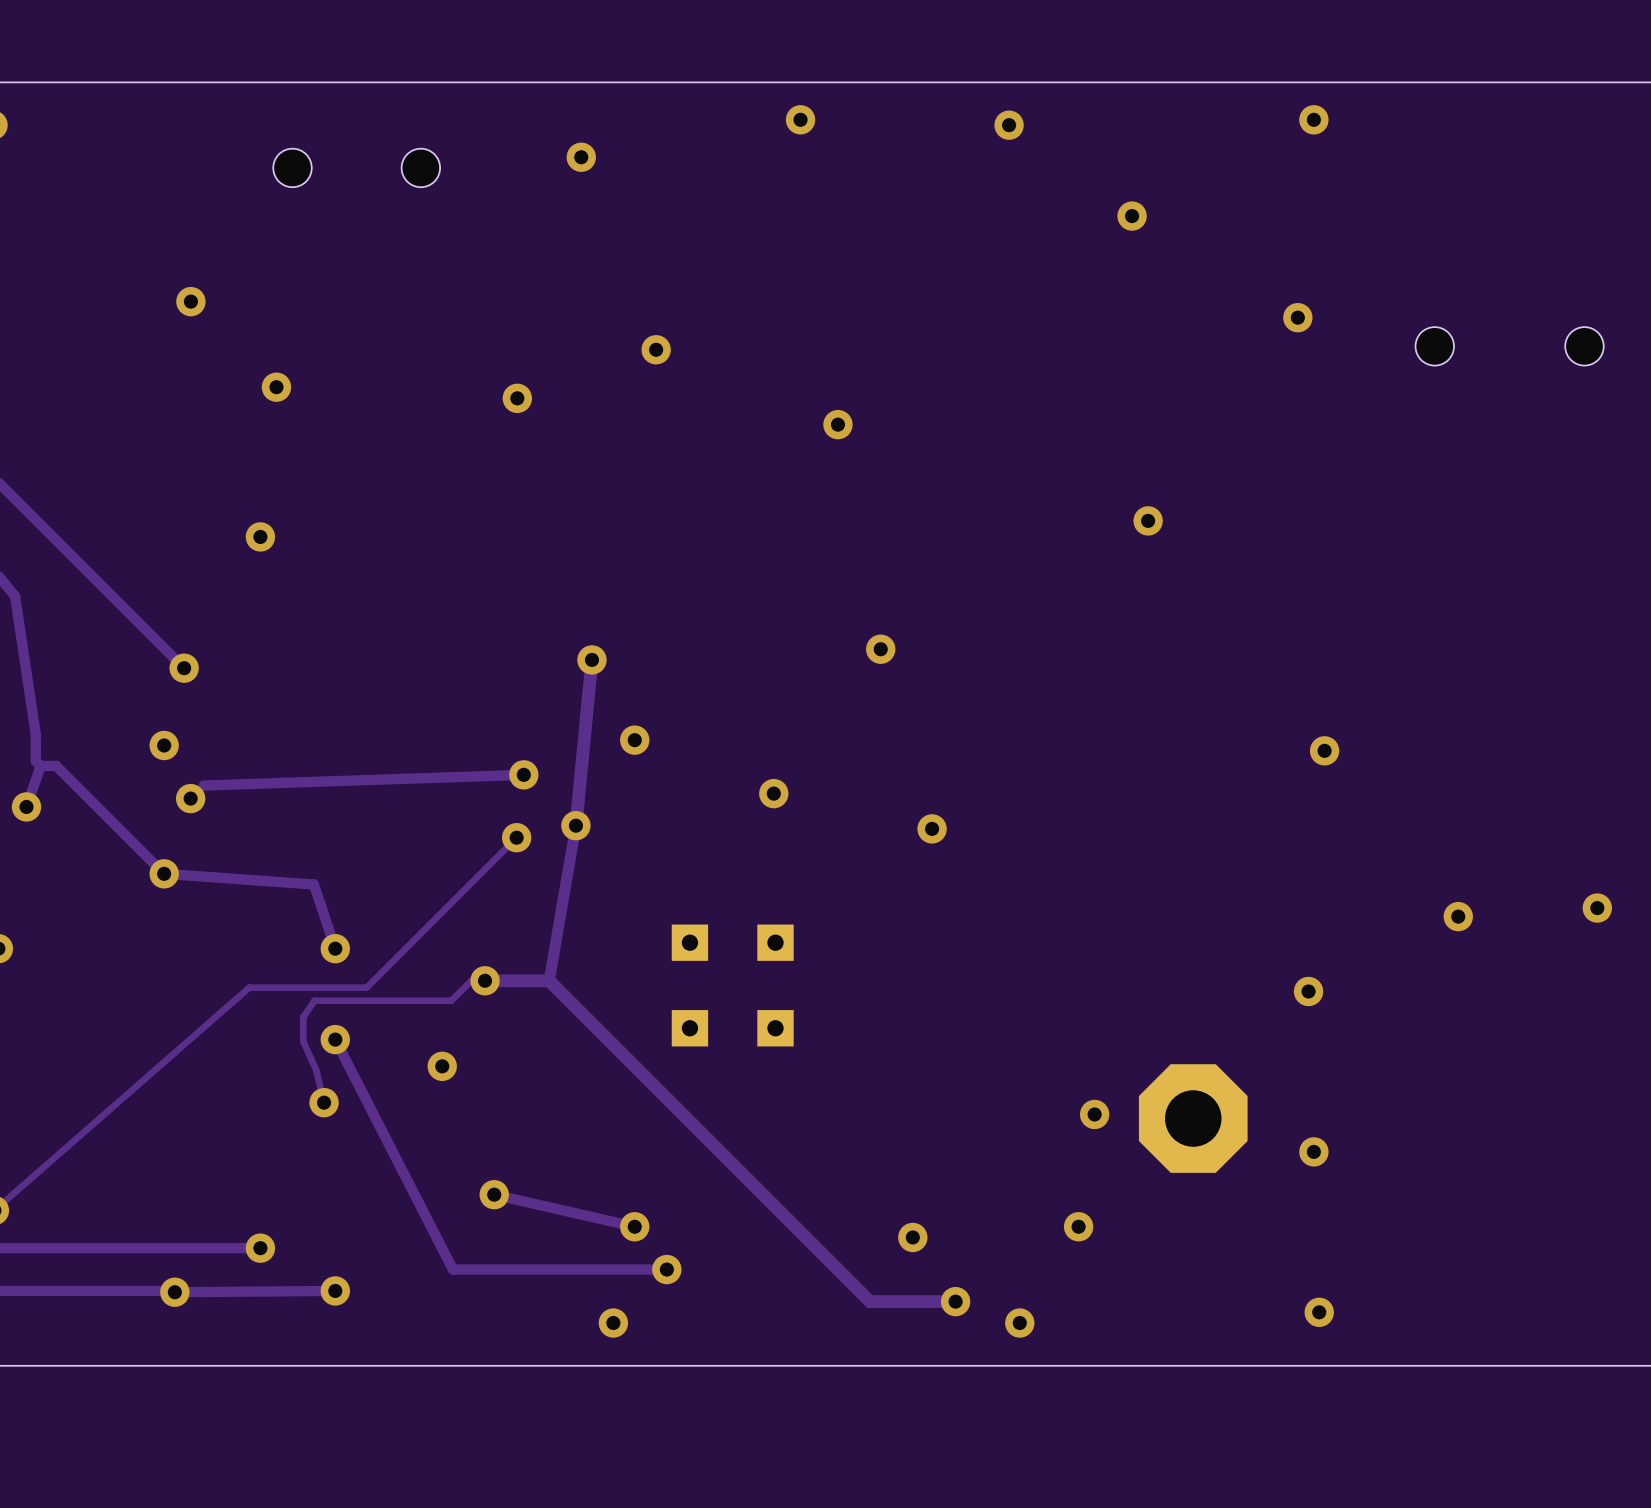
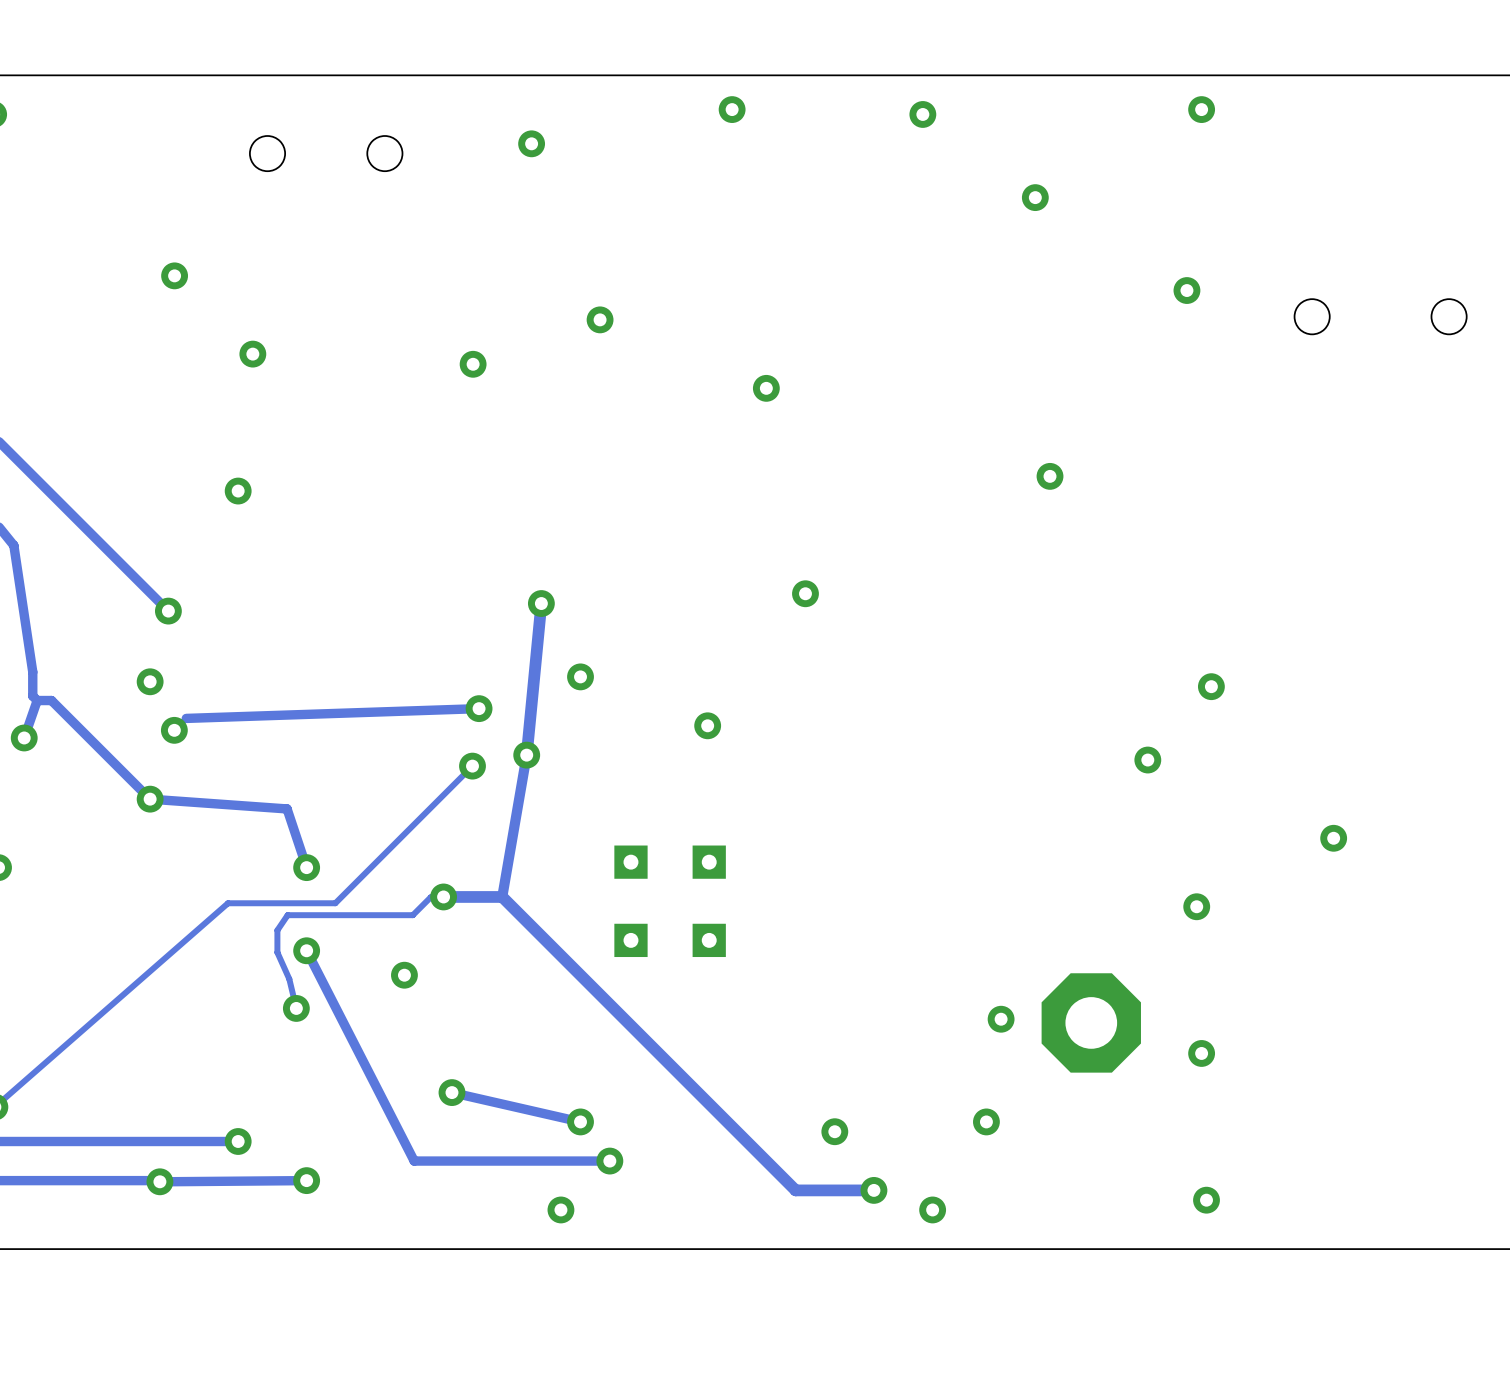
via: (932, 828) -> none
via: none -> (1147, 760)
via: (1597, 908) -> none

